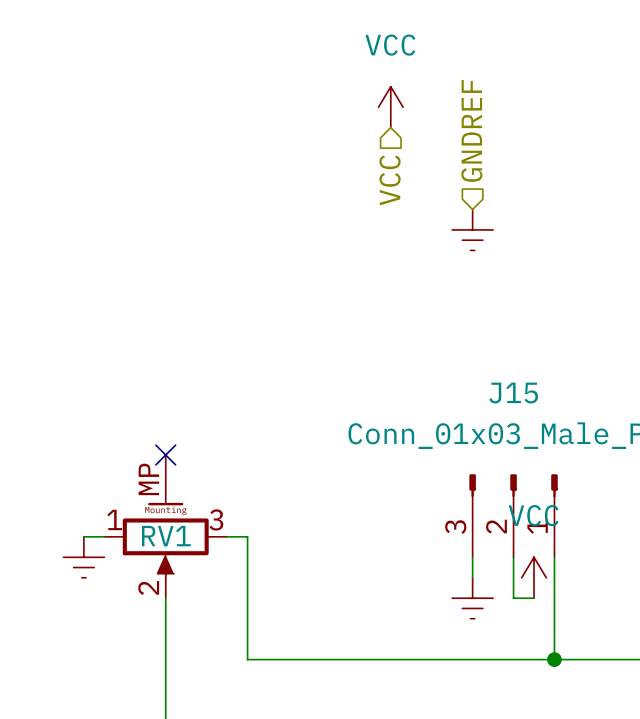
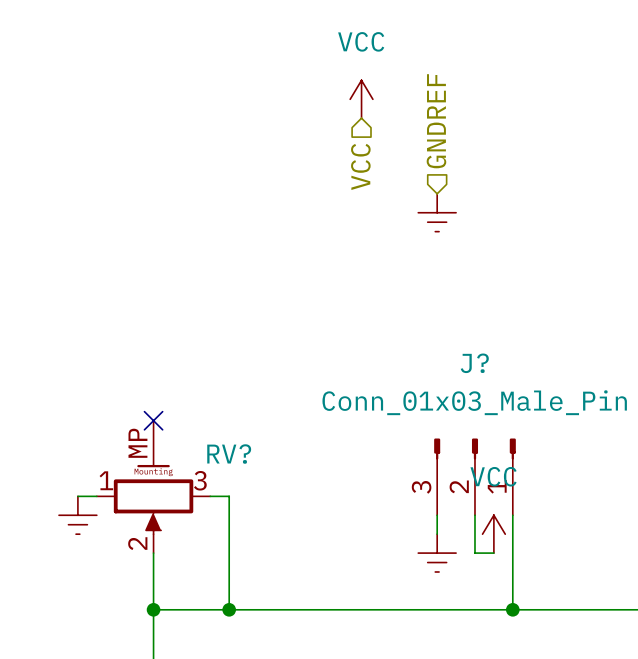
J15 name: J15 (513, 393) -> J? (474, 363)
RV1 name: RV1 (166, 536) -> RV? (229, 454)
wire: none -> (153, 609) (229, 609)
junction: none -> (153, 609)
junction: none -> (229, 609)

